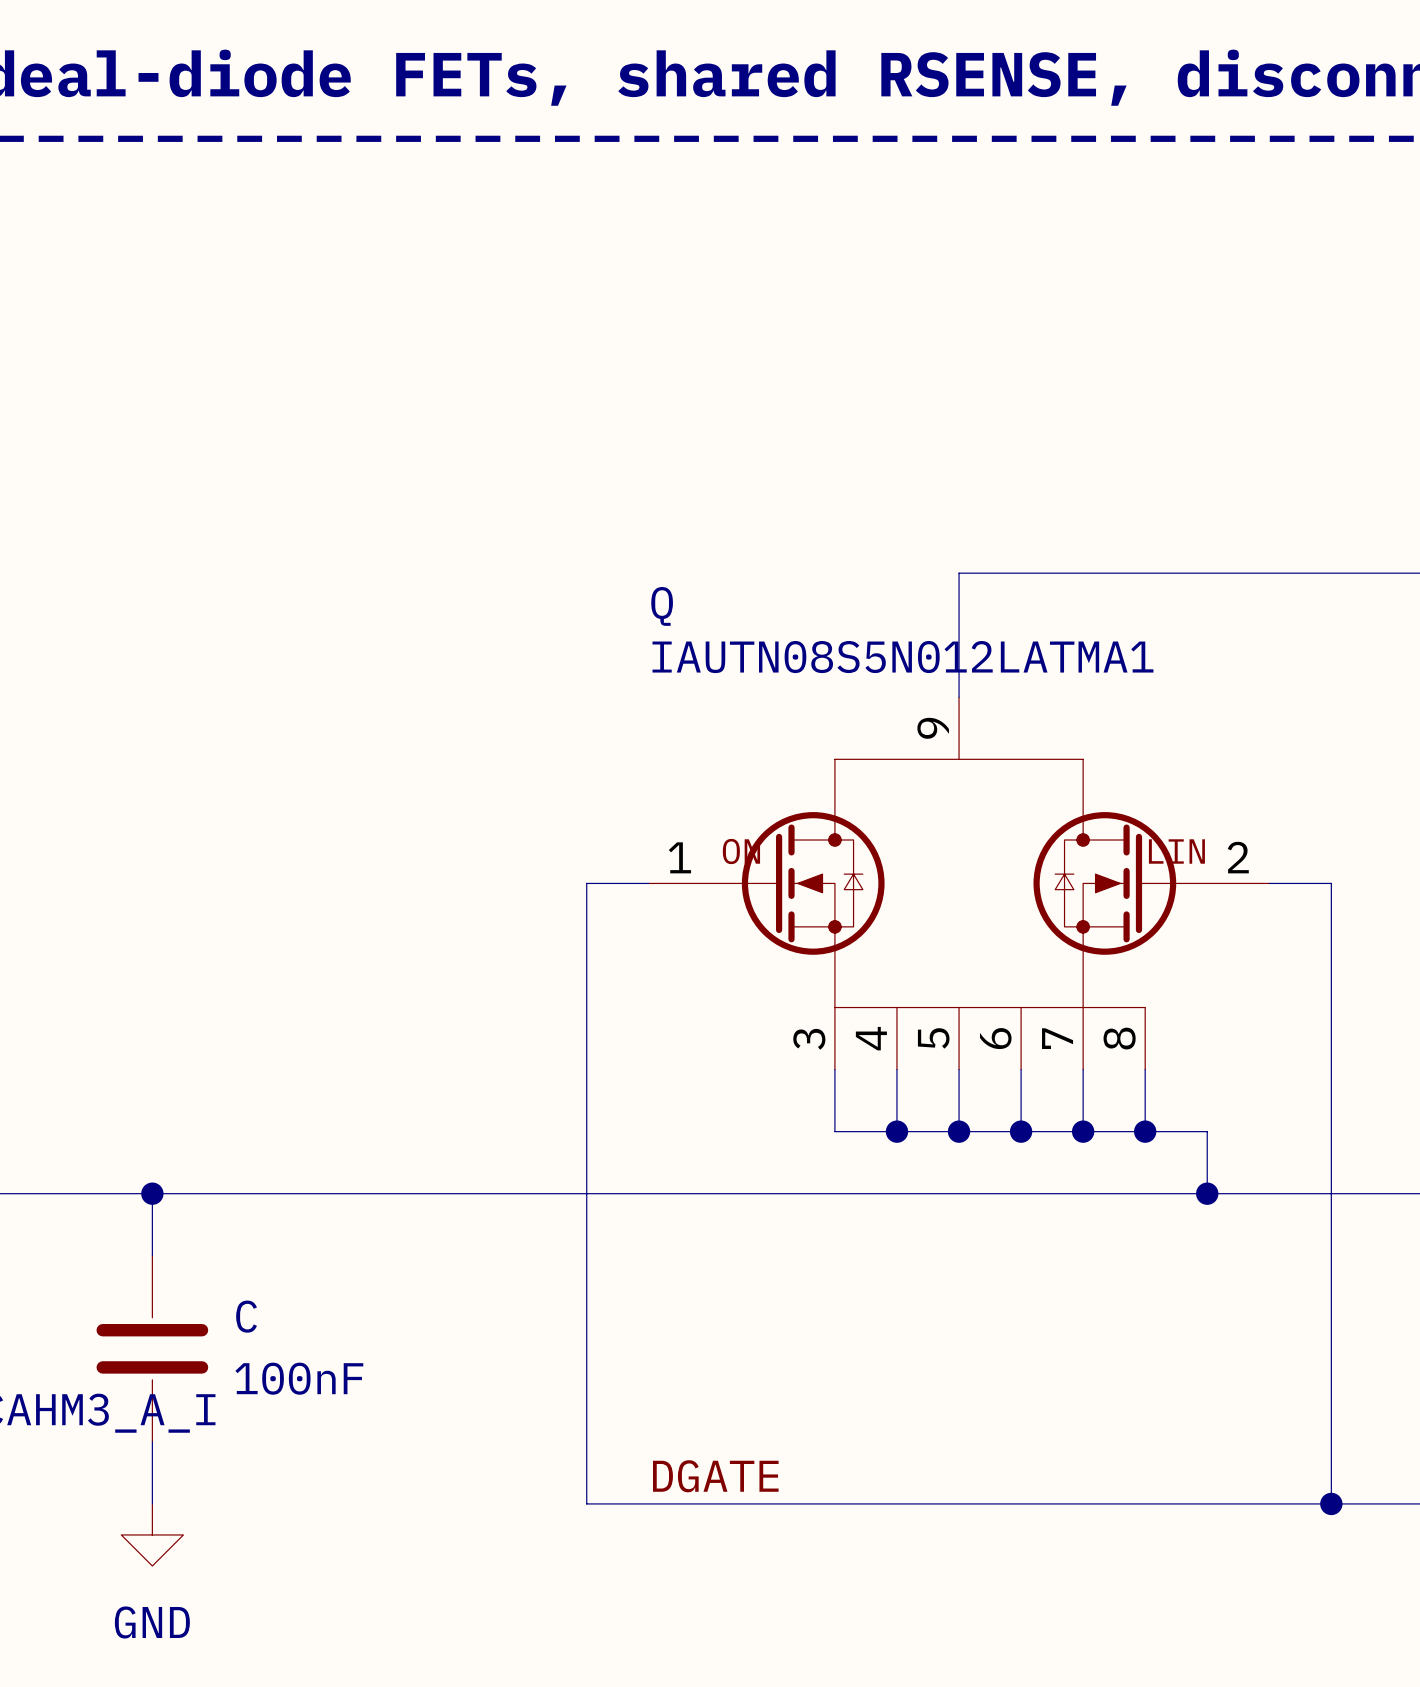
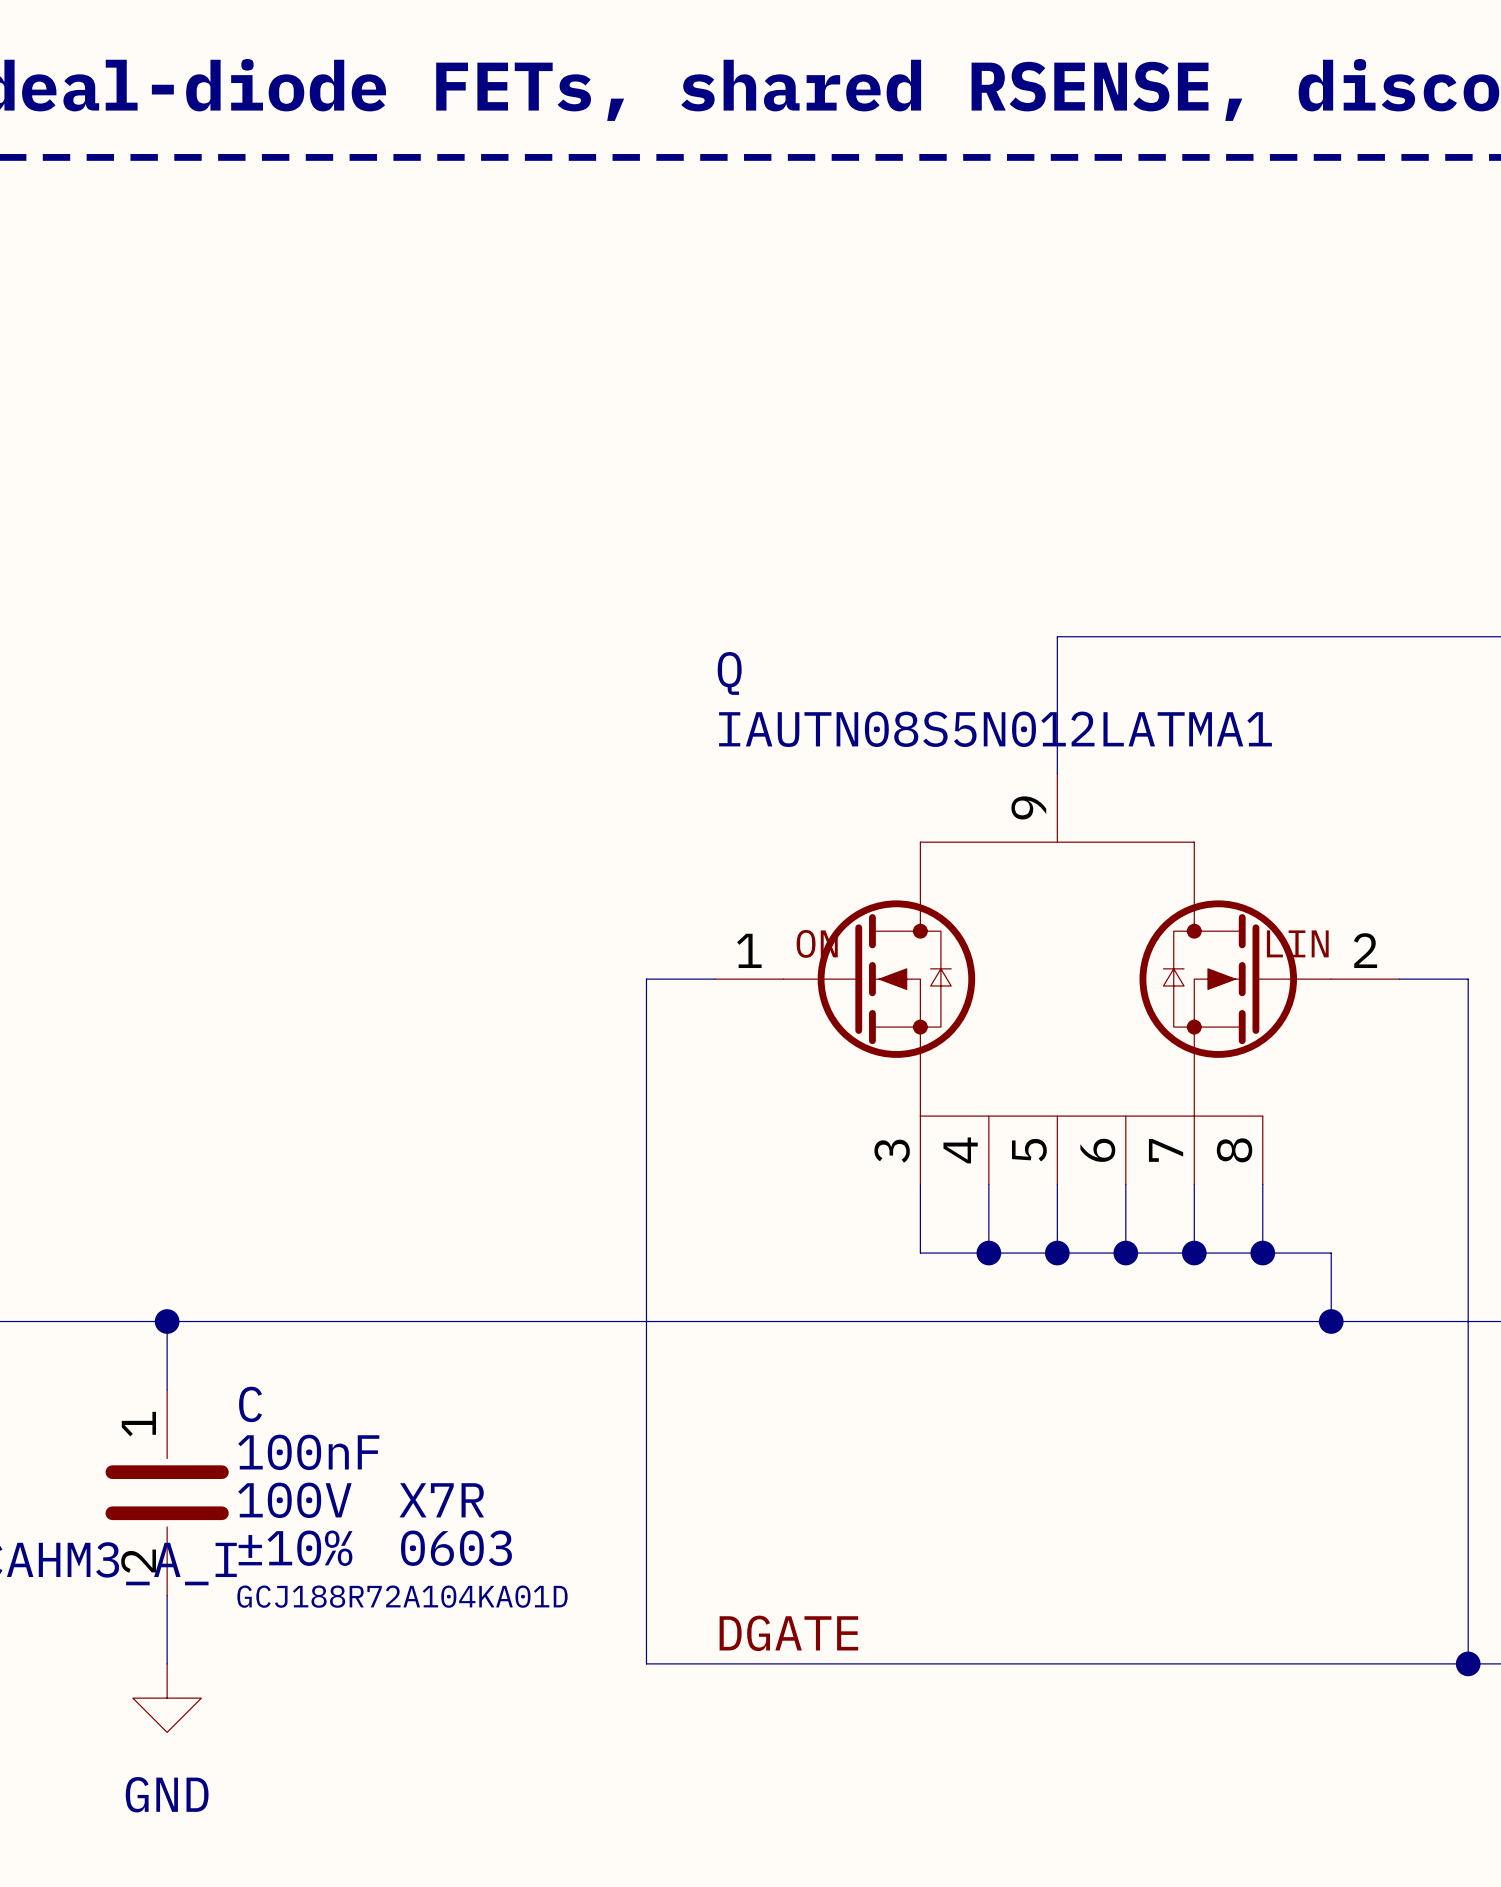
C pin number: none -> 1 (138, 1424)
C name position: C (246, 1316) -> C (250, 1404)
C text: none -> 100V (294, 1500)
C text: none -> X7R (441, 1500)
C value position: 100nF (299, 1378) -> 100nF (308, 1452)
C text: none -> ±10% (295, 1548)
C text: none -> 0603 (456, 1548)
C pin number: none -> 2 (138, 1561)
C text: none -> GCJ188R72A104KA01D (402, 1596)

